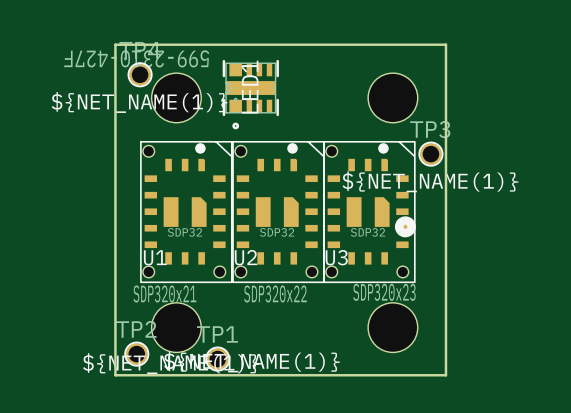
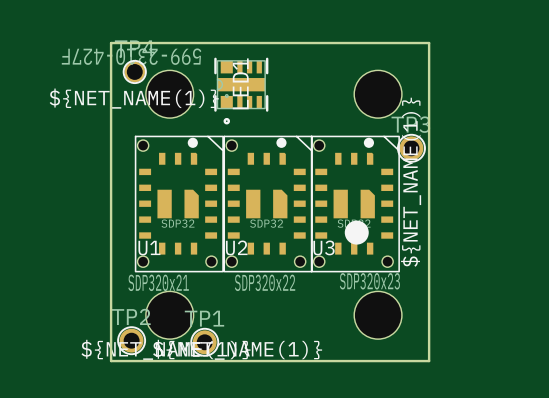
TP3 footprint: [418, 141, 444, 167] -> [396, 133, 426, 163]
part: (405, 226) -> none
part: none -> (356, 232)
TP2 footprint: [124, 341, 150, 367] -> [117, 326, 147, 356]
TP1 footprint: [205, 346, 231, 372] -> [190, 327, 220, 357]

